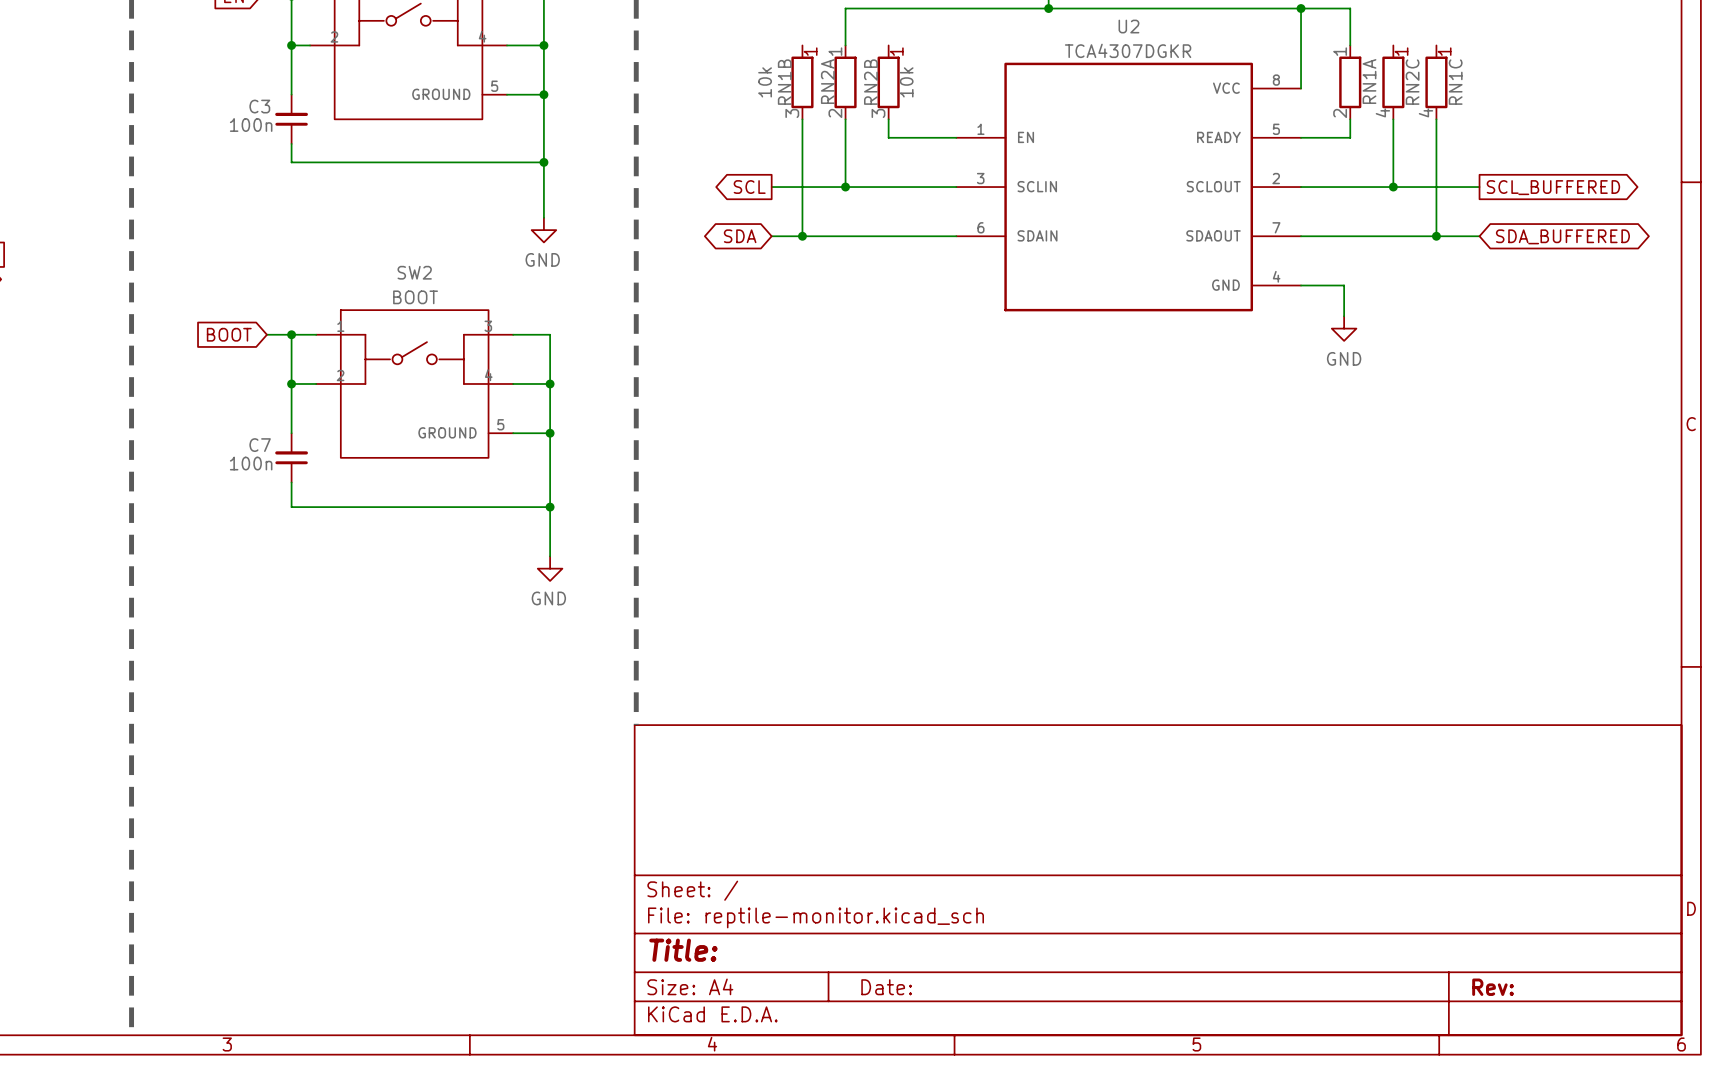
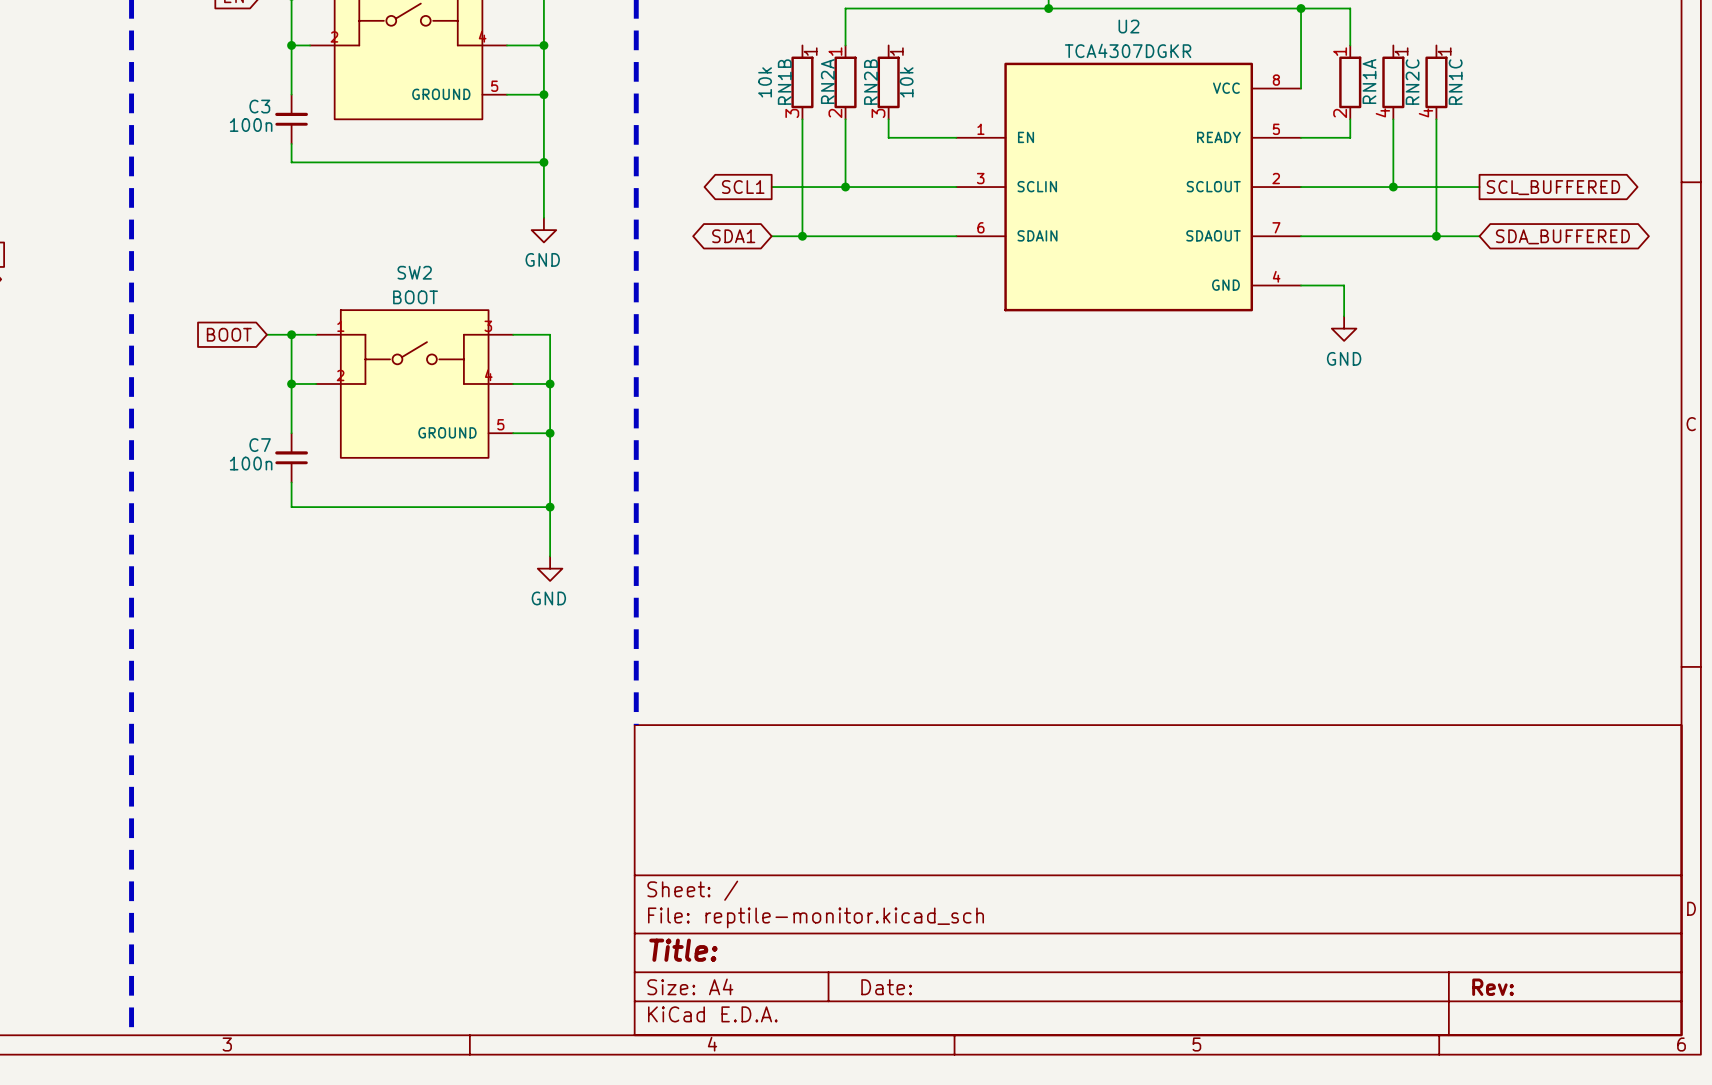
global label: SCL (749, 187) -> SCL1 (743, 187)
global label: SDA (740, 236) -> SDA1 (733, 236)

